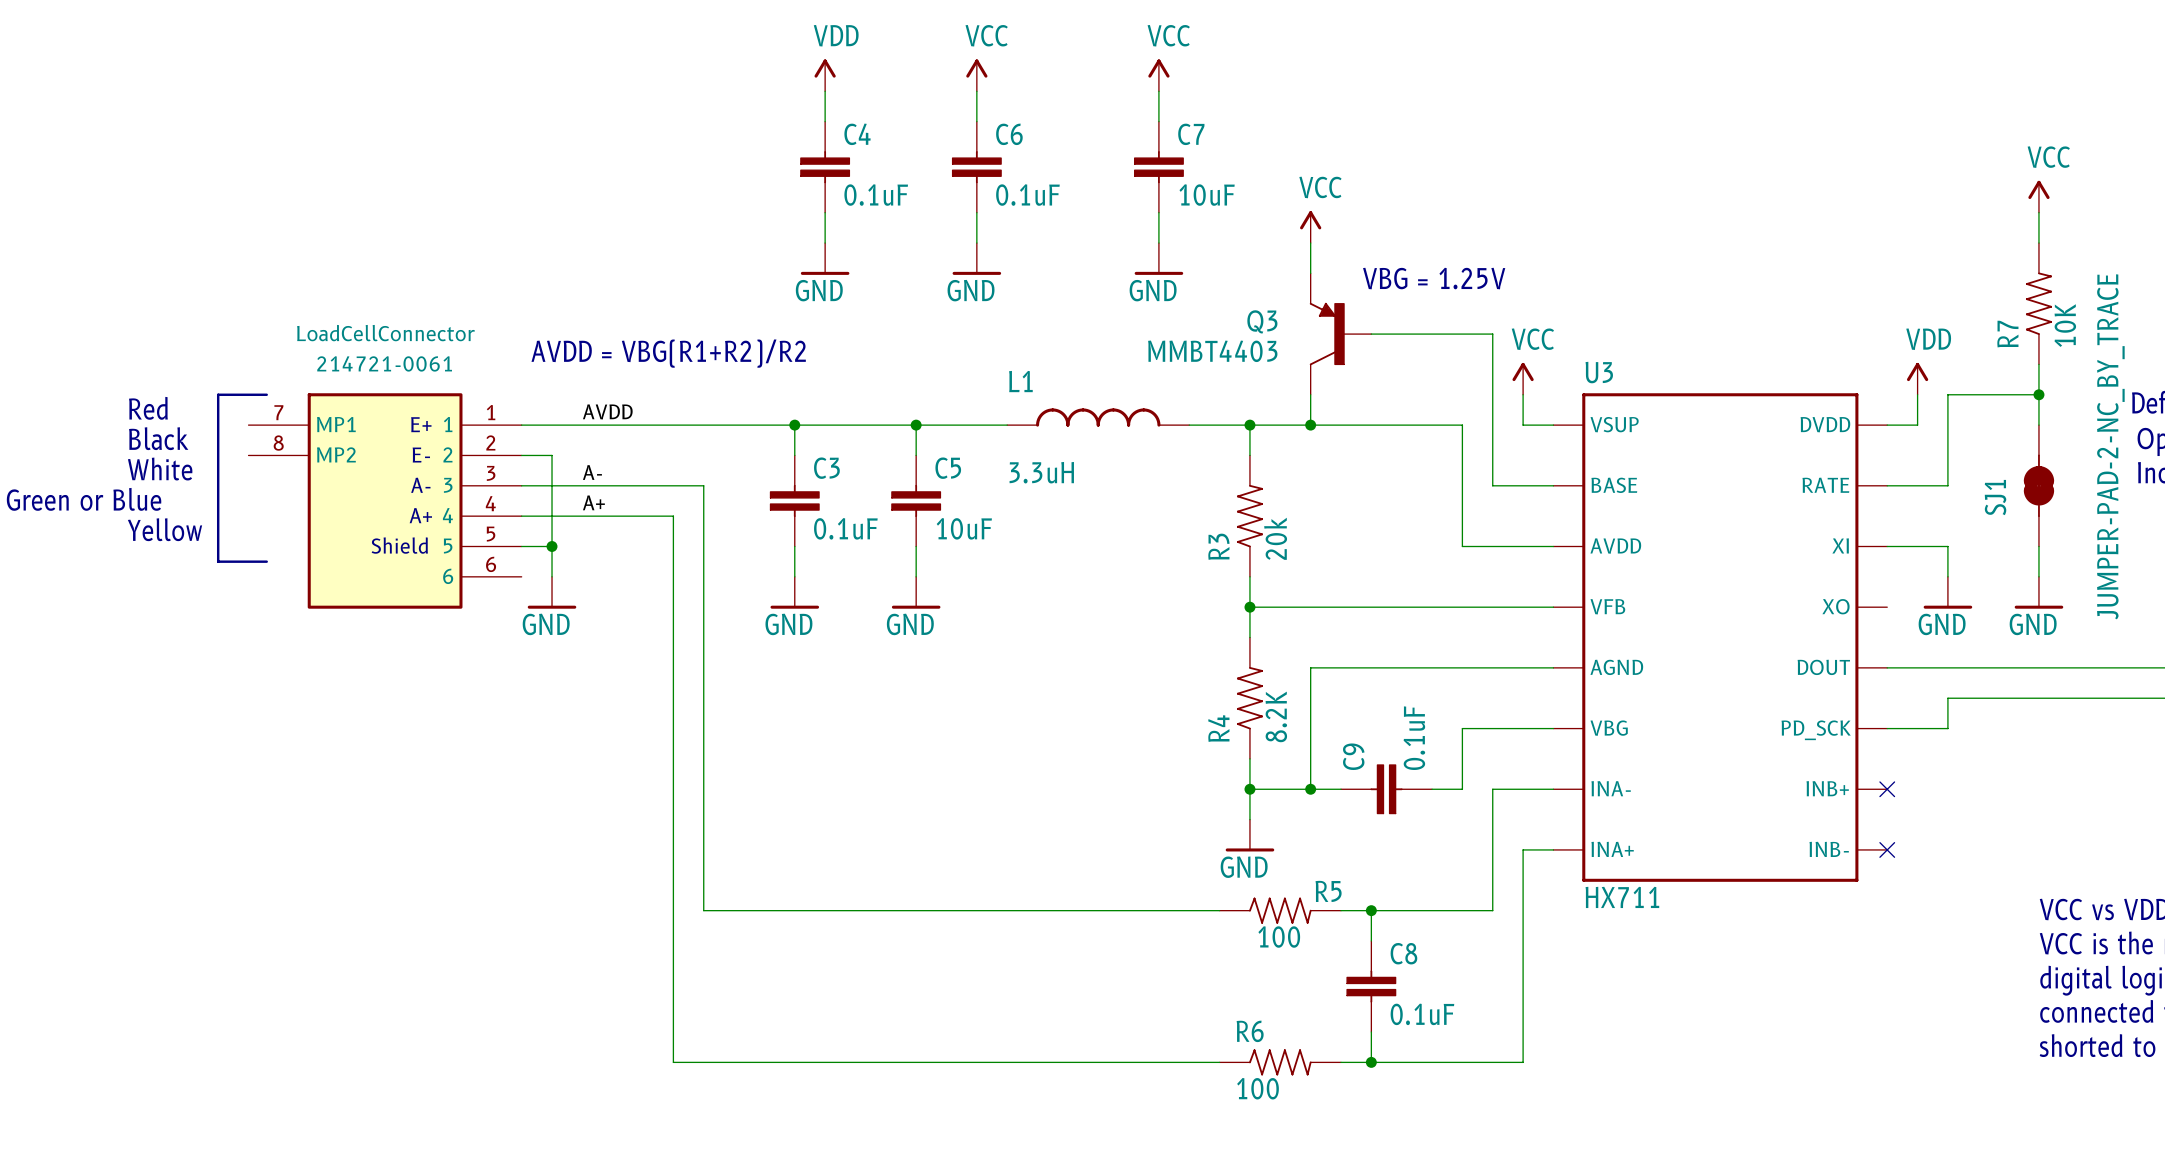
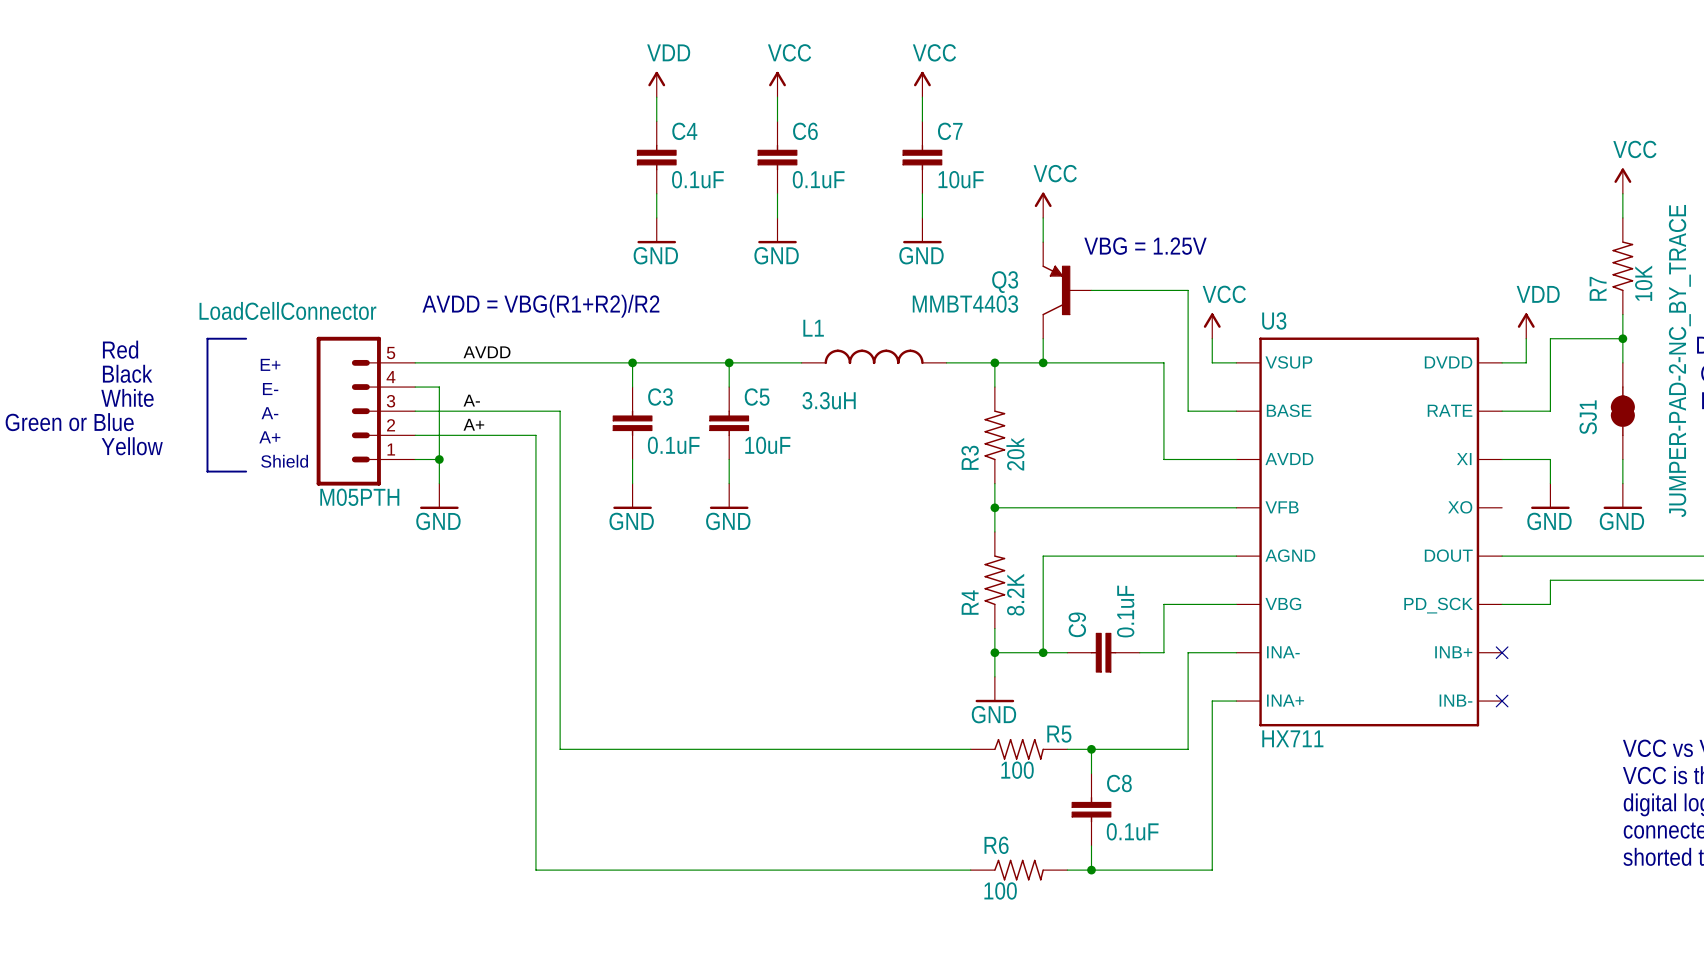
line: (260, 394) (218, 394) (218, 561) (260, 561) -> (207, 338) (207, 471)
line: none -> (212, 338) (246, 338)
text position: E+ (421, 424) -> E+ (270, 364)
text position: E- (421, 455) -> E- (270, 389)
text position: A- (420, 485) -> A- (269, 413)
LoadCellConnector: none -> M05PTH (365, 411)
LoadCellConnector: 214721-0061 (385, 500) -> none
text position: A+ (420, 515) -> A+ (269, 437)
text position: Shield (399, 545) -> Shield (284, 461)
line: none -> (212, 471) (246, 471)

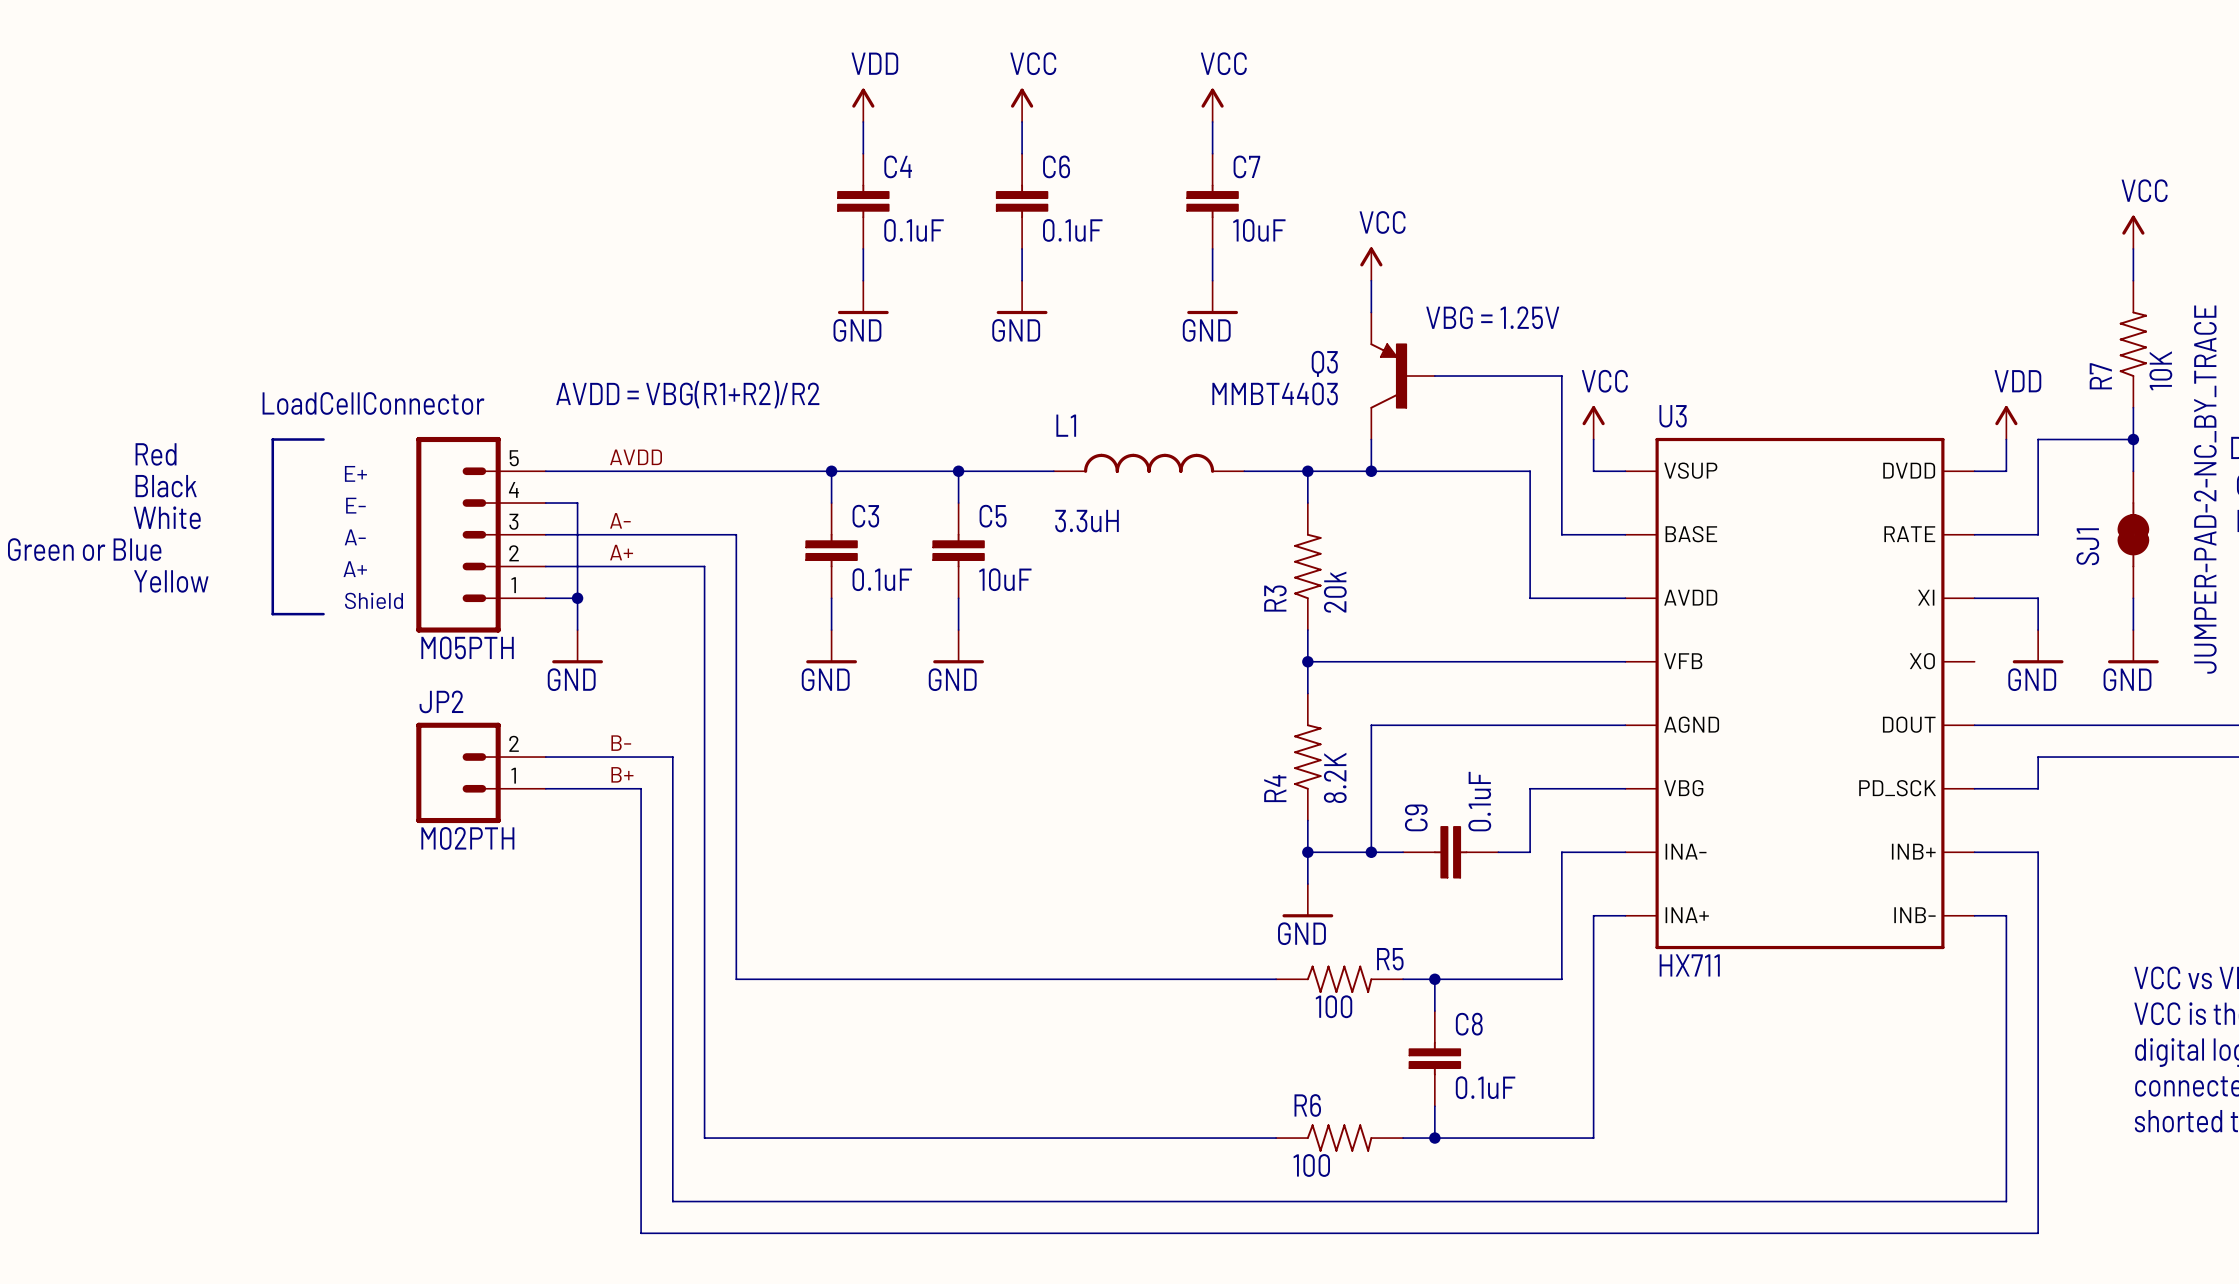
label: none -> B- (621, 743)
wire: none -> (545, 757) (672, 757) (672, 1201) (2006, 1201) (2006, 915) (1974, 915)
JP2: none -> M02PTH (481, 772)
label: none -> B+ (622, 774)
wire: none -> (545, 788) (641, 788) (641, 1233) (2038, 1233) (2038, 852) (1974, 852)
no-connect mark: (1502, 652) -> none
no-connect mark: (1502, 701) -> none

